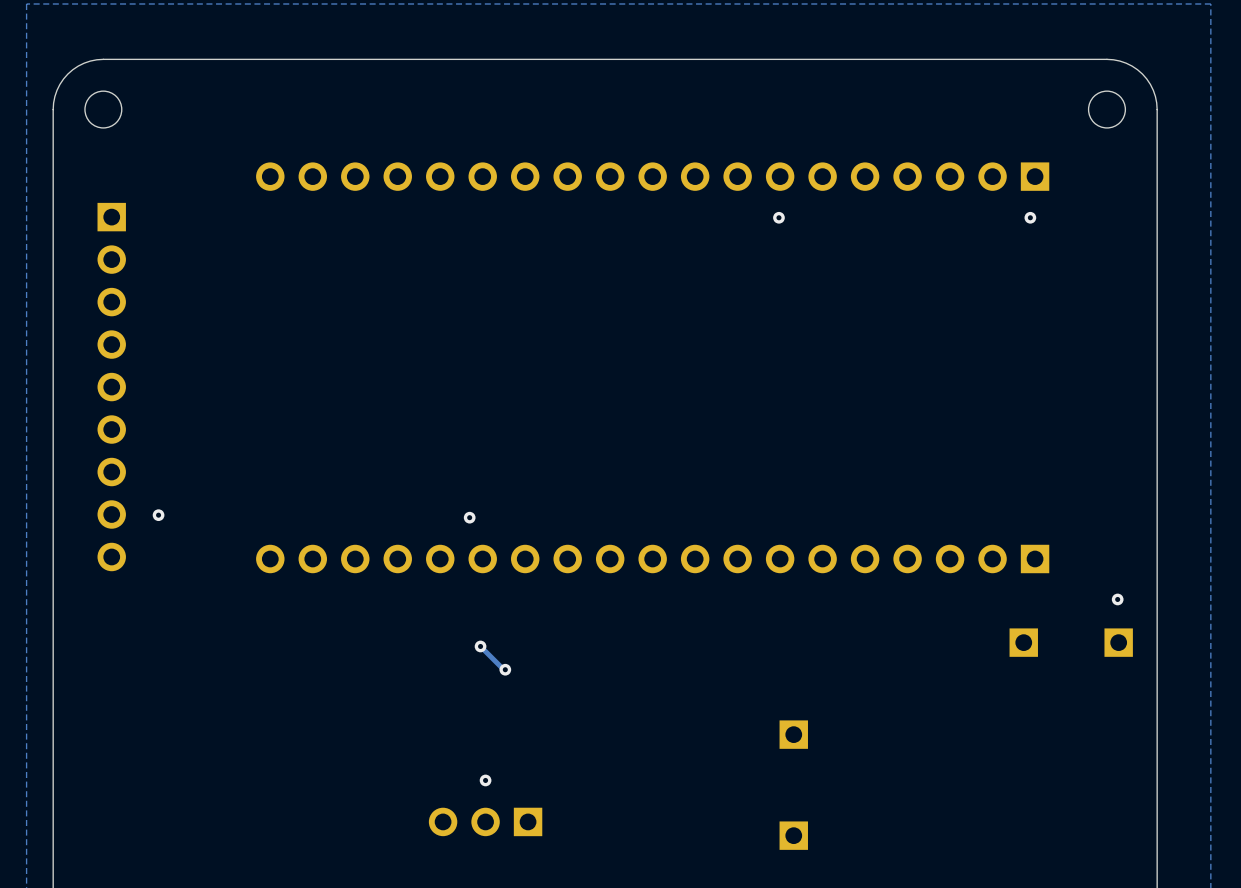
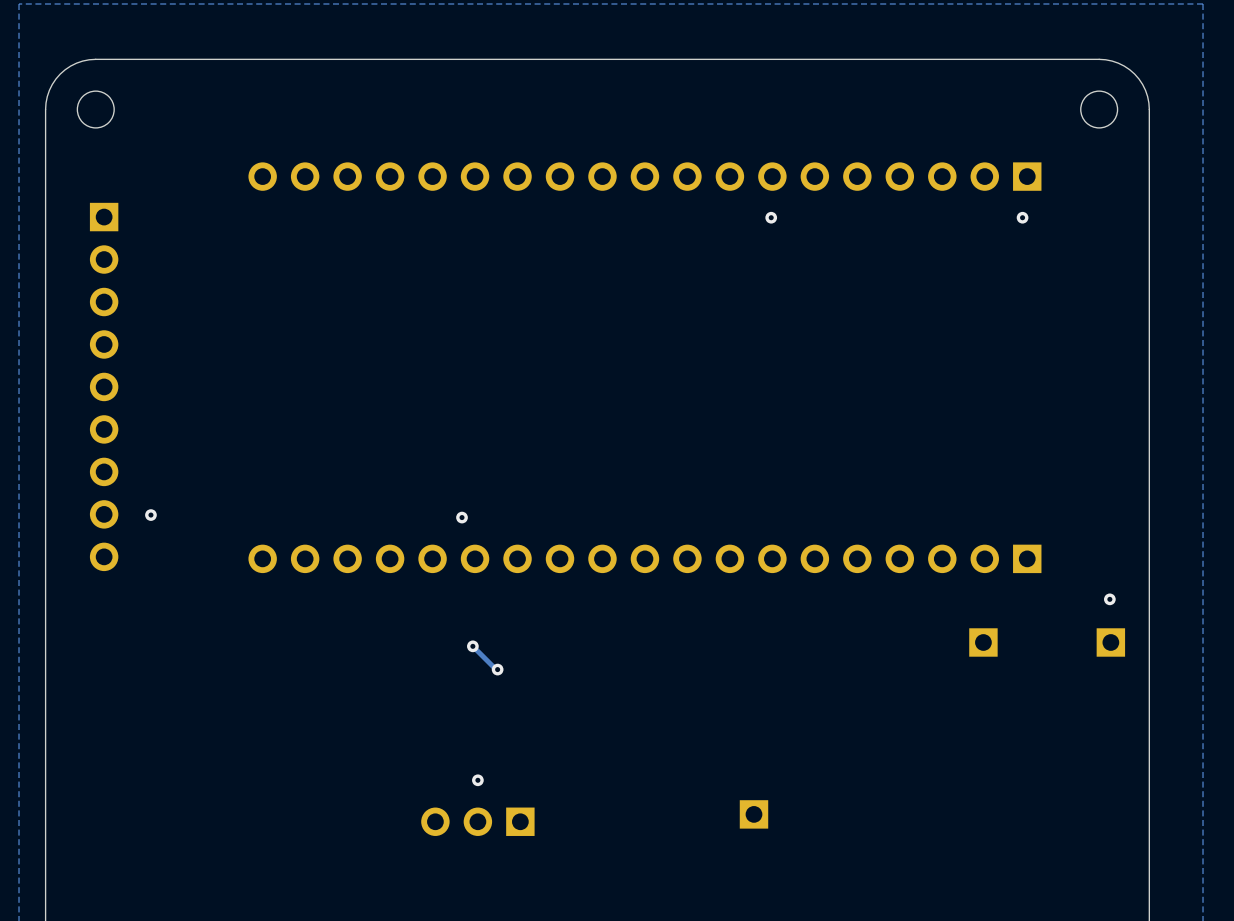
part position: (1023, 642) -> (983, 642)
part: (793, 734) -> none
part position: (793, 835) -> (753, 814)

